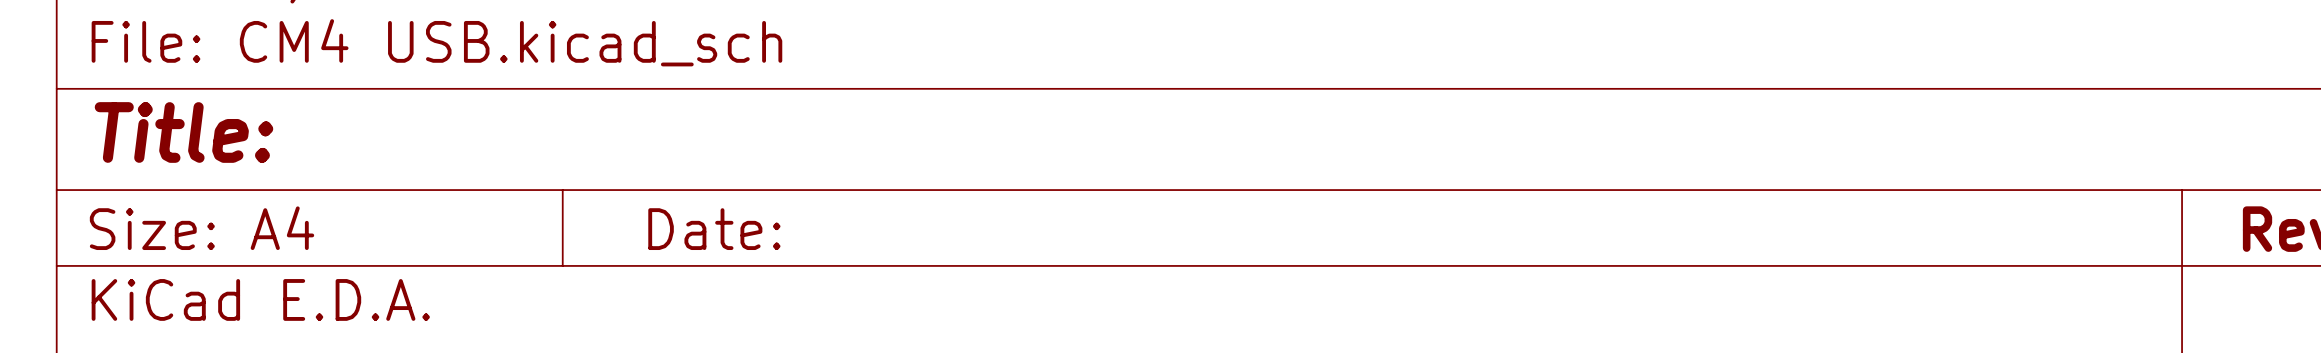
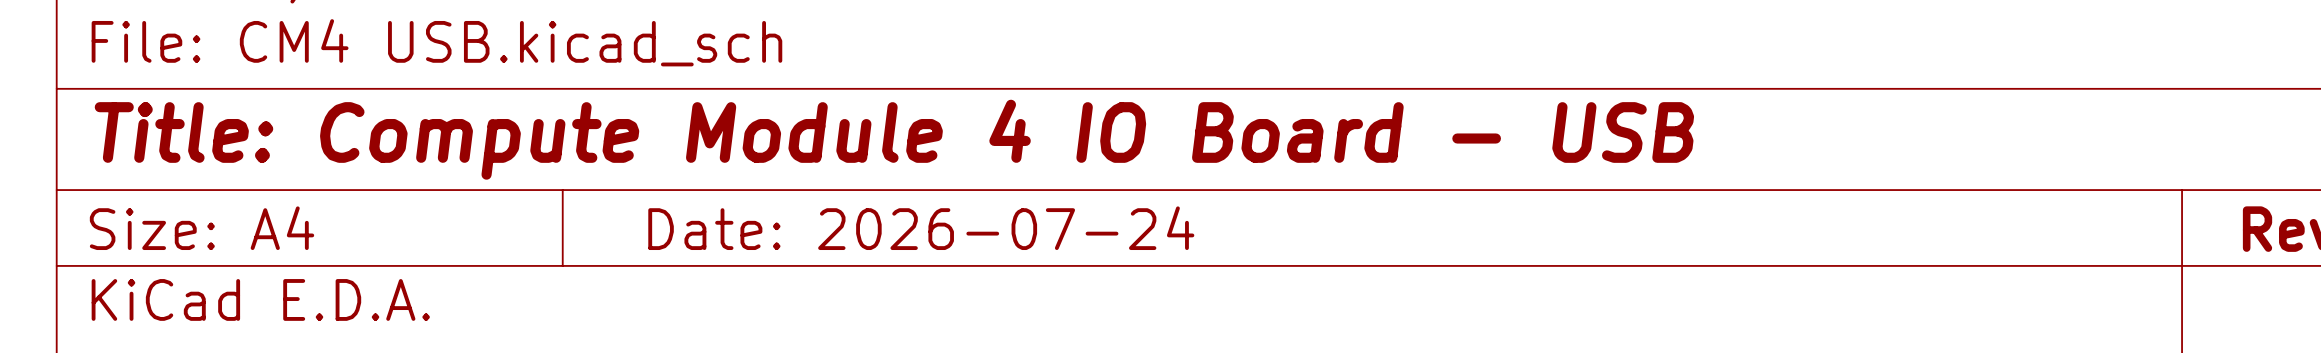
title block: Title: (183, 132) -> Title: Compute Module 4 IO Board - USB (894, 139)
title block: Date: (714, 229) -> Date: 2026-07-24 (921, 228)

